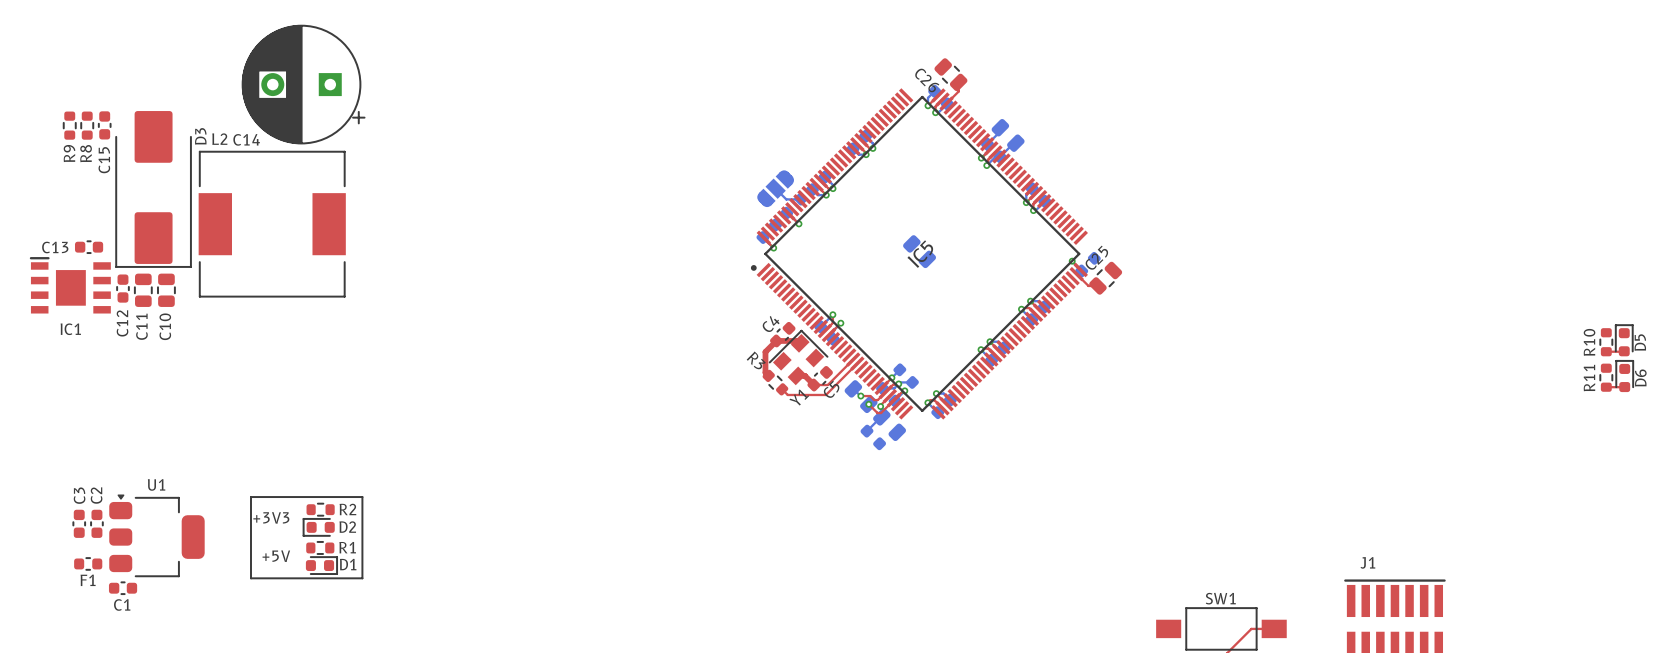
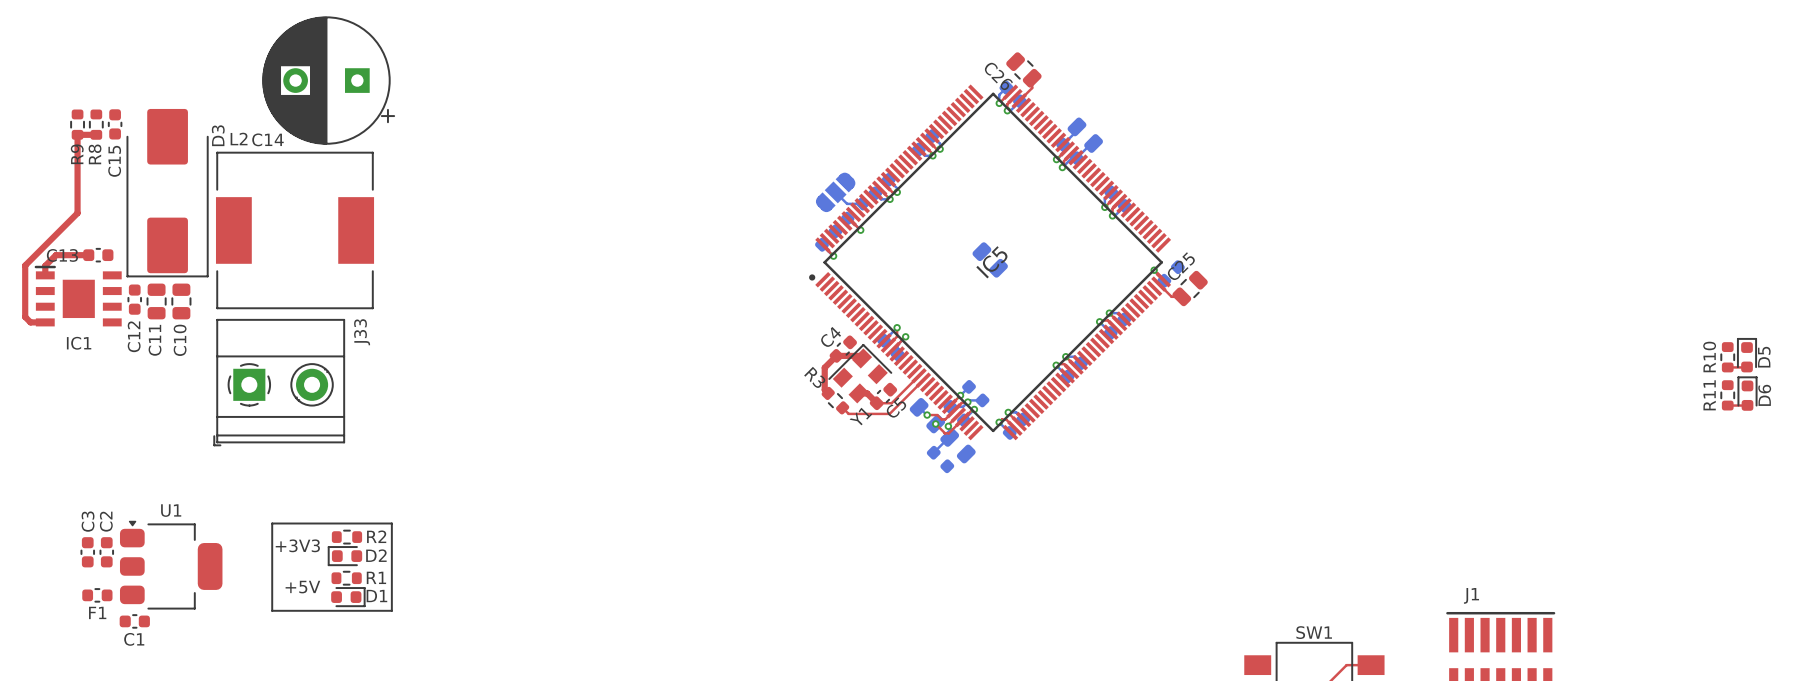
top track: none -> (96, 134) (77, 134) (77, 213) (25, 265) (25, 317) (30, 322) (45, 322)
top track: none -> (88, 255) (55, 255) (45, 265) (45, 275)
J33: none -> (279, 382)

